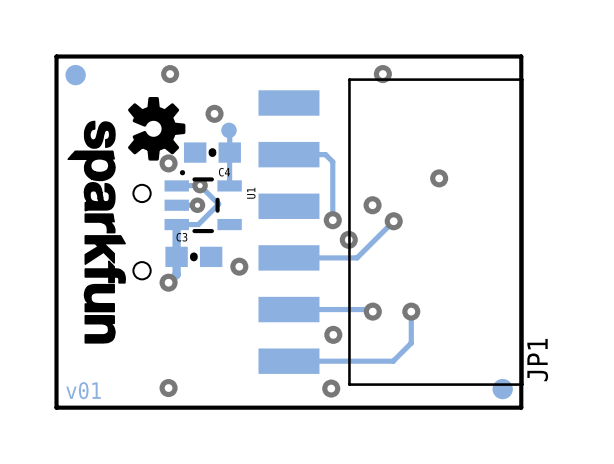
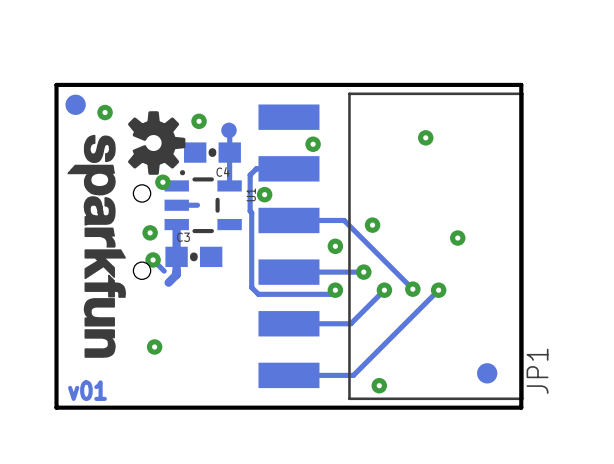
via: (170, 74) -> none
via: (382, 74) -> none
part position: (75, 75) -> (75, 104)
board edge: (521, 84) (521, 56) (56, 56) (56, 84) -> (521, 84) (56, 84)
via: none -> (105, 112)
via position: (214, 113) -> (199, 121)
drawing position: (156, 128) -> (156, 143)
via: none -> (425, 137)
via: none -> (313, 144)
track: (288, 154) (325, 154) (332, 161) (332, 220) -> none
via: (168, 163) -> none
track: none -> (288, 168) (256, 168) (250, 175) (251, 287) (258, 294) (331, 294) (335, 290)
via: (439, 178) -> none
via: none -> (162, 182)
track: (176, 185) (200, 185) (218, 204) (198, 224) (176, 224) -> none
via: (200, 185) -> none
via: none -> (264, 194)
via: (197, 205) -> none
via: (372, 205) -> none
track: none -> (288, 220) (344, 220) (412, 289)
via: (332, 220) -> none
track: (393, 221) (357, 257) (288, 257) -> none
via: (393, 221) -> none
via: none -> (372, 225)
drawing position: (96, 232) -> (96, 246)
via: none -> (150, 232)
JP1 position: (391, 232) -> (391, 246)
via: none -> (457, 238)
via position: (348, 239) -> (335, 246)
track: none -> (153, 259) (164, 271)
via: none -> (153, 259)
via: (239, 266) -> none
track: none -> (363, 272) (288, 272)
via: none -> (363, 272)
via: (168, 282) -> none
via: none -> (412, 289)
via: none -> (335, 290)
track: none -> (384, 290) (350, 323) (288, 323)
via: none -> (384, 290)
track: none -> (438, 290) (353, 375) (288, 375)
via: none -> (438, 290)
track: (288, 309) (370, 309) (372, 311) -> none
via: (372, 311) -> none
track: (411, 311) (411, 343) (393, 361) (288, 361) -> none
via: (411, 311) -> none
via: (333, 334) -> none
via: none -> (154, 346)
via: none -> (379, 385)
via: (168, 388) -> none
via: (331, 388) -> none
part position: (502, 389) -> (487, 373)

